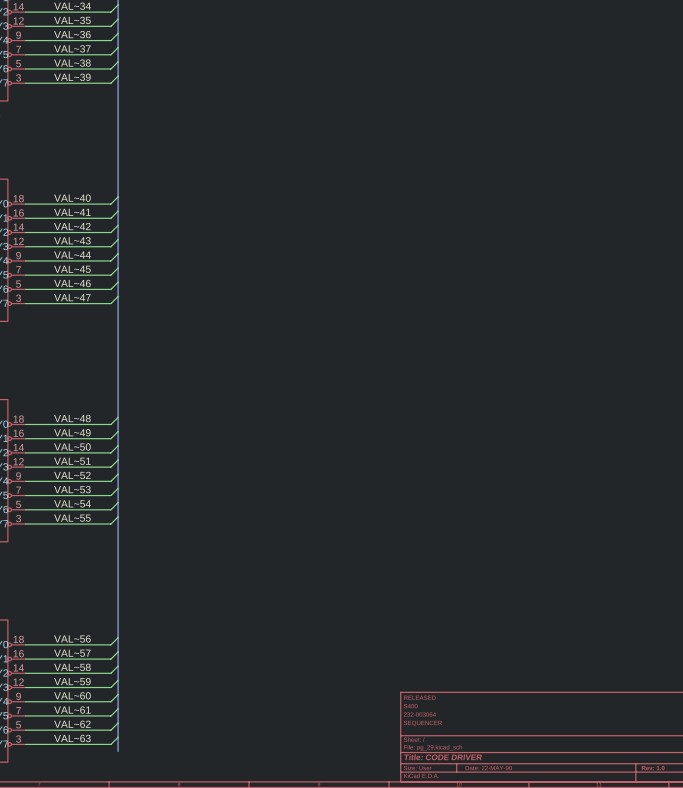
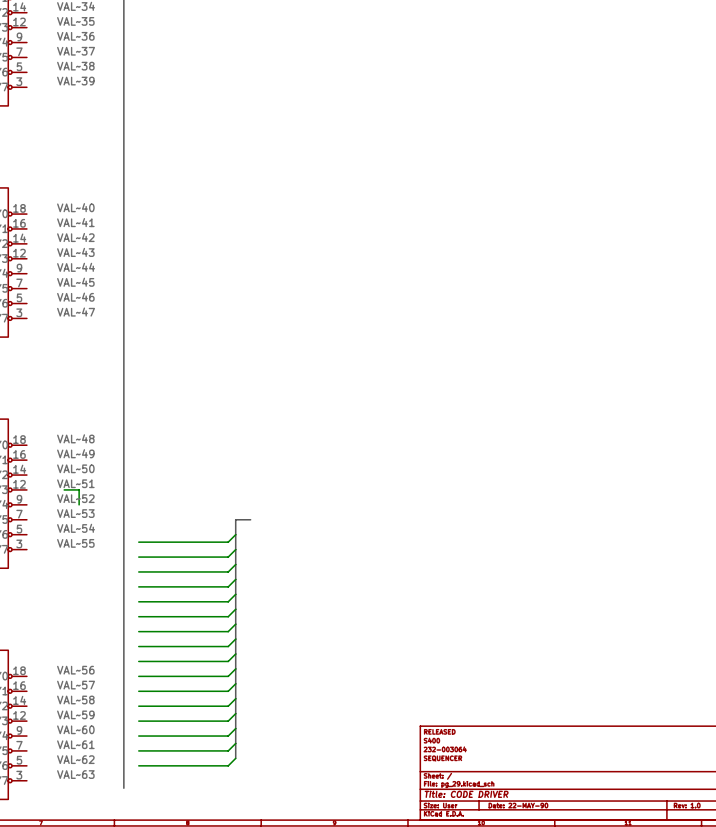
wire: (118, 5) (110, 12) (25, 12) -> none
wire: (118, 19) (110, 26) (25, 26) -> none
wire: (118, 33) (110, 40) (25, 40) -> none
wire: (118, 47) (110, 54) (25, 54) -> none
wire: (118, 61) (110, 68) (25, 68) -> none
wire: (118, 76) (110, 83) (25, 83) -> none
wire: (118, 196) (110, 204) (25, 204) -> none
wire: (118, 211) (110, 218) (25, 218) -> none
wire: (118, 225) (110, 232) (25, 232) -> none
wire: (118, 239) (110, 246) (25, 246) -> none
wire: (118, 253) (110, 260) (25, 260) -> none
wire: (118, 268) (110, 275) (25, 275) -> none
wire: (118, 282) (110, 289) (25, 289) -> none
wire: (118, 296) (110, 303) (25, 303) -> none
wire: (118, 417) (110, 424) (25, 424) -> none
wire: (118, 431) (110, 438) (25, 438) -> none
wire: (118, 445) (110, 452) (25, 452) -> none
wire: (118, 460) (110, 467) (75, 467) -> (79, 504) (79, 489)
wire: (25, 467) (61, 467) -> none
wire: (118, 474) (110, 481) (25, 481) -> none
wire: (118, 488) (110, 495) (25, 495) -> none
bus: none -> (250, 519) (235, 519) (235, 758)
wire: (118, 502) (110, 509) (25, 509) -> none
wire: none -> (235, 534) (228, 542) (138, 542)
wire: (118, 516) (110, 524) (25, 524) -> none
wire: none -> (235, 549) (228, 557) (138, 557)
wire: none -> (235, 564) (228, 571) (138, 571)
wire: none -> (235, 579) (228, 586) (138, 586)
wire: none -> (235, 594) (228, 601) (138, 601)
wire: none -> (235, 609) (228, 616) (138, 616)
wire: none -> (235, 624) (228, 631) (138, 631)
wire: none -> (235, 639) (228, 646) (138, 646)
wire: none -> (235, 654) (228, 661) (138, 661)
wire: (118, 637) (110, 644) (25, 644) -> none
wire: none -> (235, 668) (228, 676) (138, 676)
wire: (118, 651) (110, 659) (25, 659) -> none
wire: none -> (235, 683) (228, 691) (138, 691)
wire: (118, 666) (110, 673) (25, 673) -> none
wire: none -> (235, 698) (228, 706) (138, 706)
wire: (118, 680) (110, 687) (25, 687) -> none
wire: none -> (235, 713) (228, 721) (138, 721)
wire: (118, 694) (110, 701) (25, 701) -> none
wire: none -> (235, 728) (228, 736) (138, 736)
wire: (118, 708) (110, 715) (25, 715) -> none
wire: none -> (235, 743) (228, 750) (138, 750)
wire: (118, 723) (110, 730) (25, 730) -> none
wire: none -> (235, 758) (228, 765) (138, 765)
wire: (118, 737) (110, 744) (25, 744) -> none

